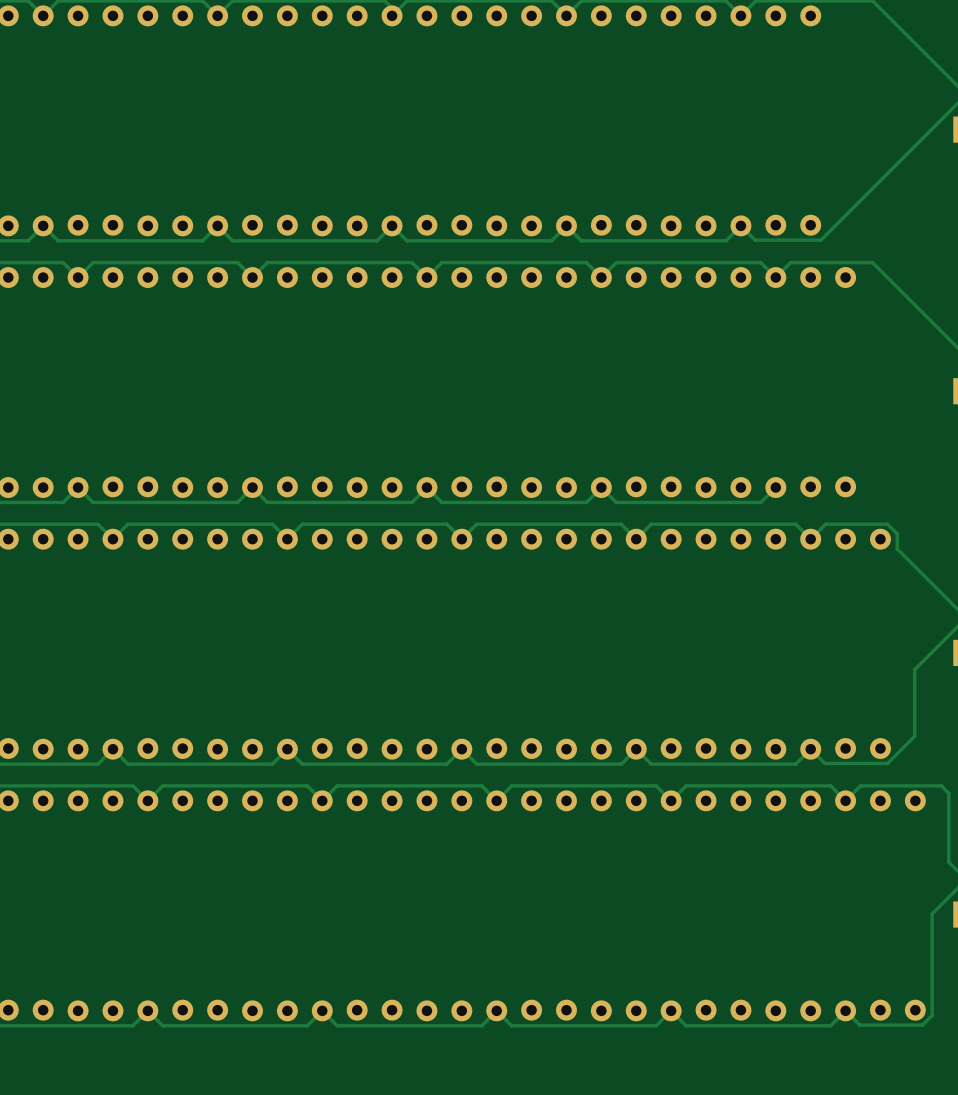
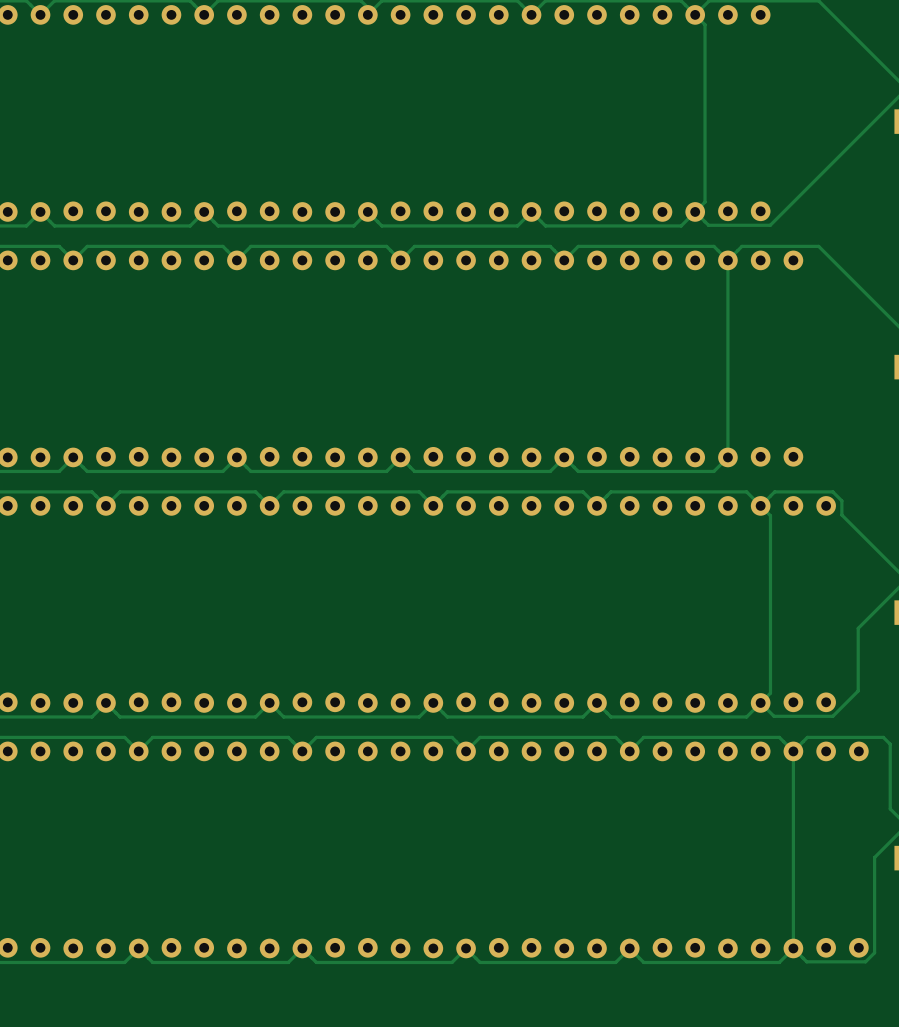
track: none -> (695, 14) (705, 24) (705, 202) (695, 211)
track: none -> (727, 260) (727, 457)
track: none -> (760, 505) (770, 515) (770, 693) (760, 702)
track: none -> (793, 751) (793, 948)

